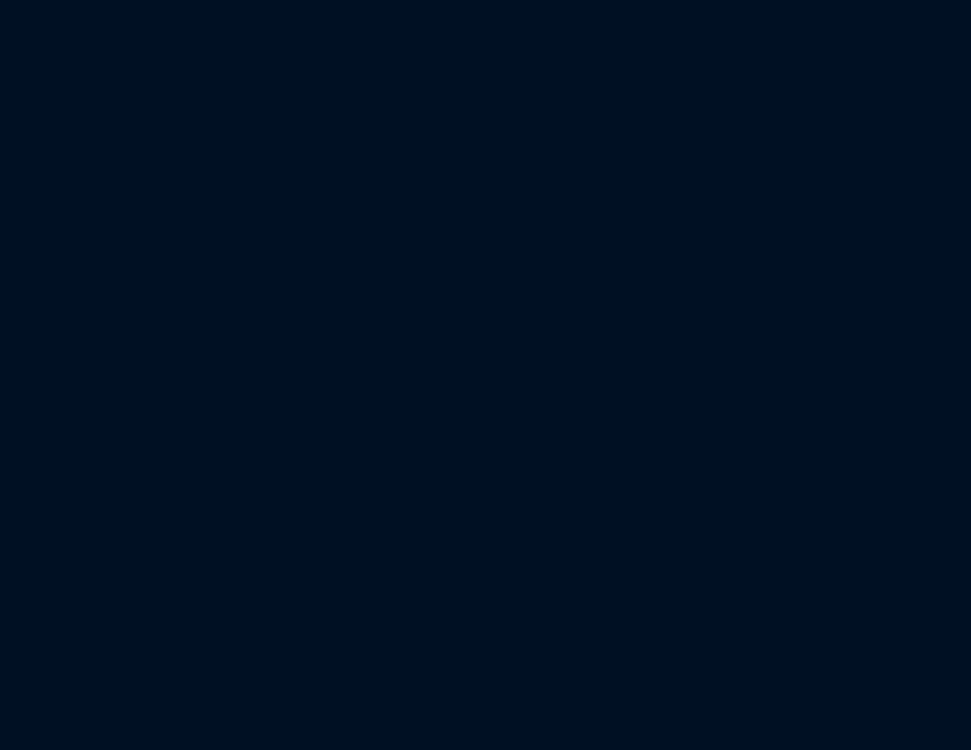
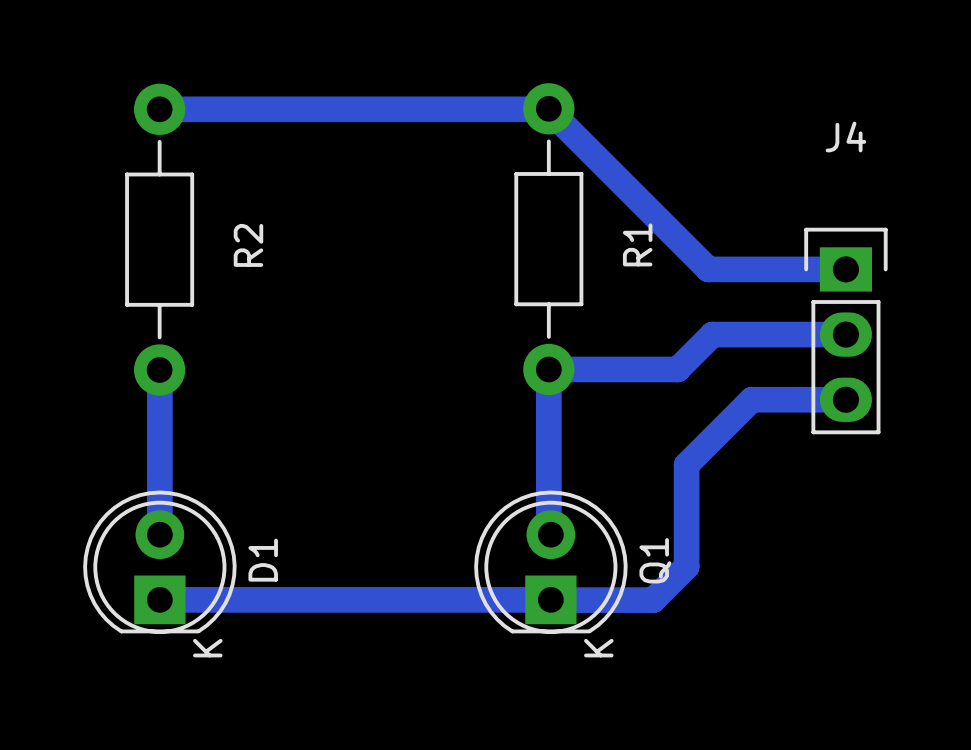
bottom track: none -> (159, 109) (548, 109) (708, 269) (845, 269)
R2: none -> (159, 239)
R1: none -> (548, 239)
J4: none -> (845, 330)
bottom track: none -> (845, 334) (712, 334) (677, 369) (548, 369) (548, 532) (550, 534)
bottom track: none -> (159, 370) (159, 534)
bottom track: none -> (845, 399) (751, 399) (686, 464) (686, 566) (653, 600) (553, 600)
D1: none -> (159, 562)
Q1: none -> (550, 562)
bottom track: none -> (159, 599) (553, 599)

